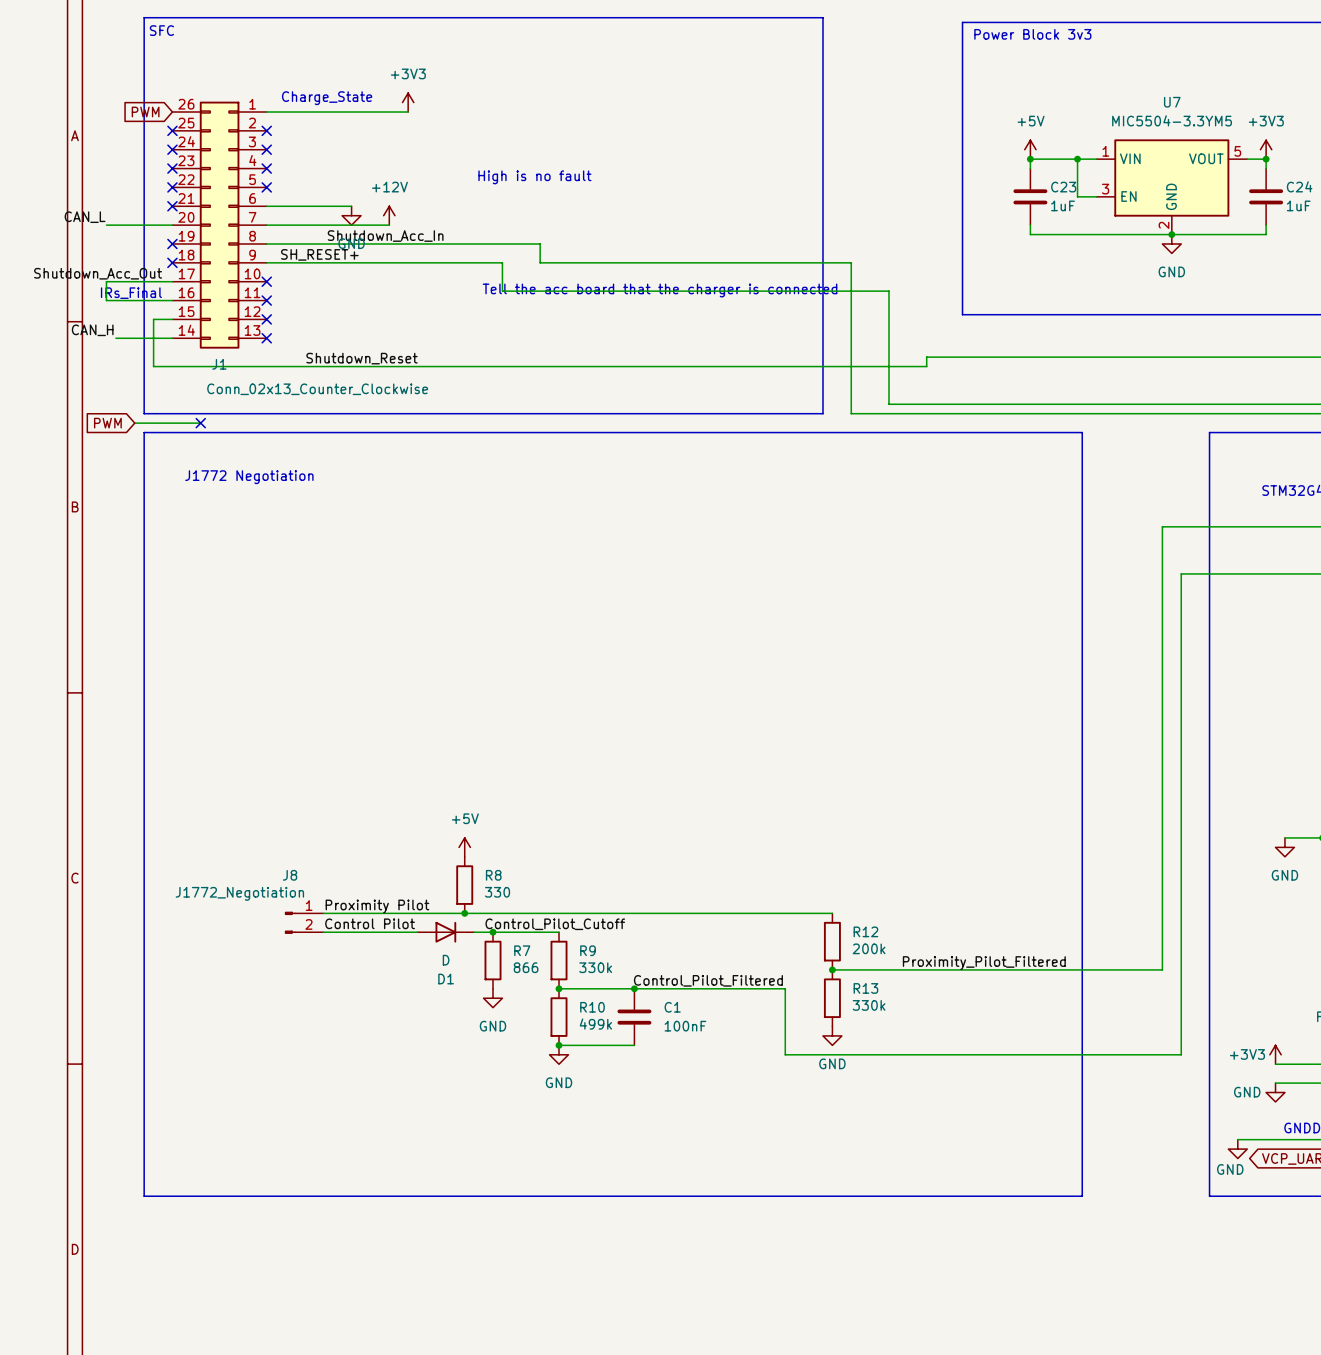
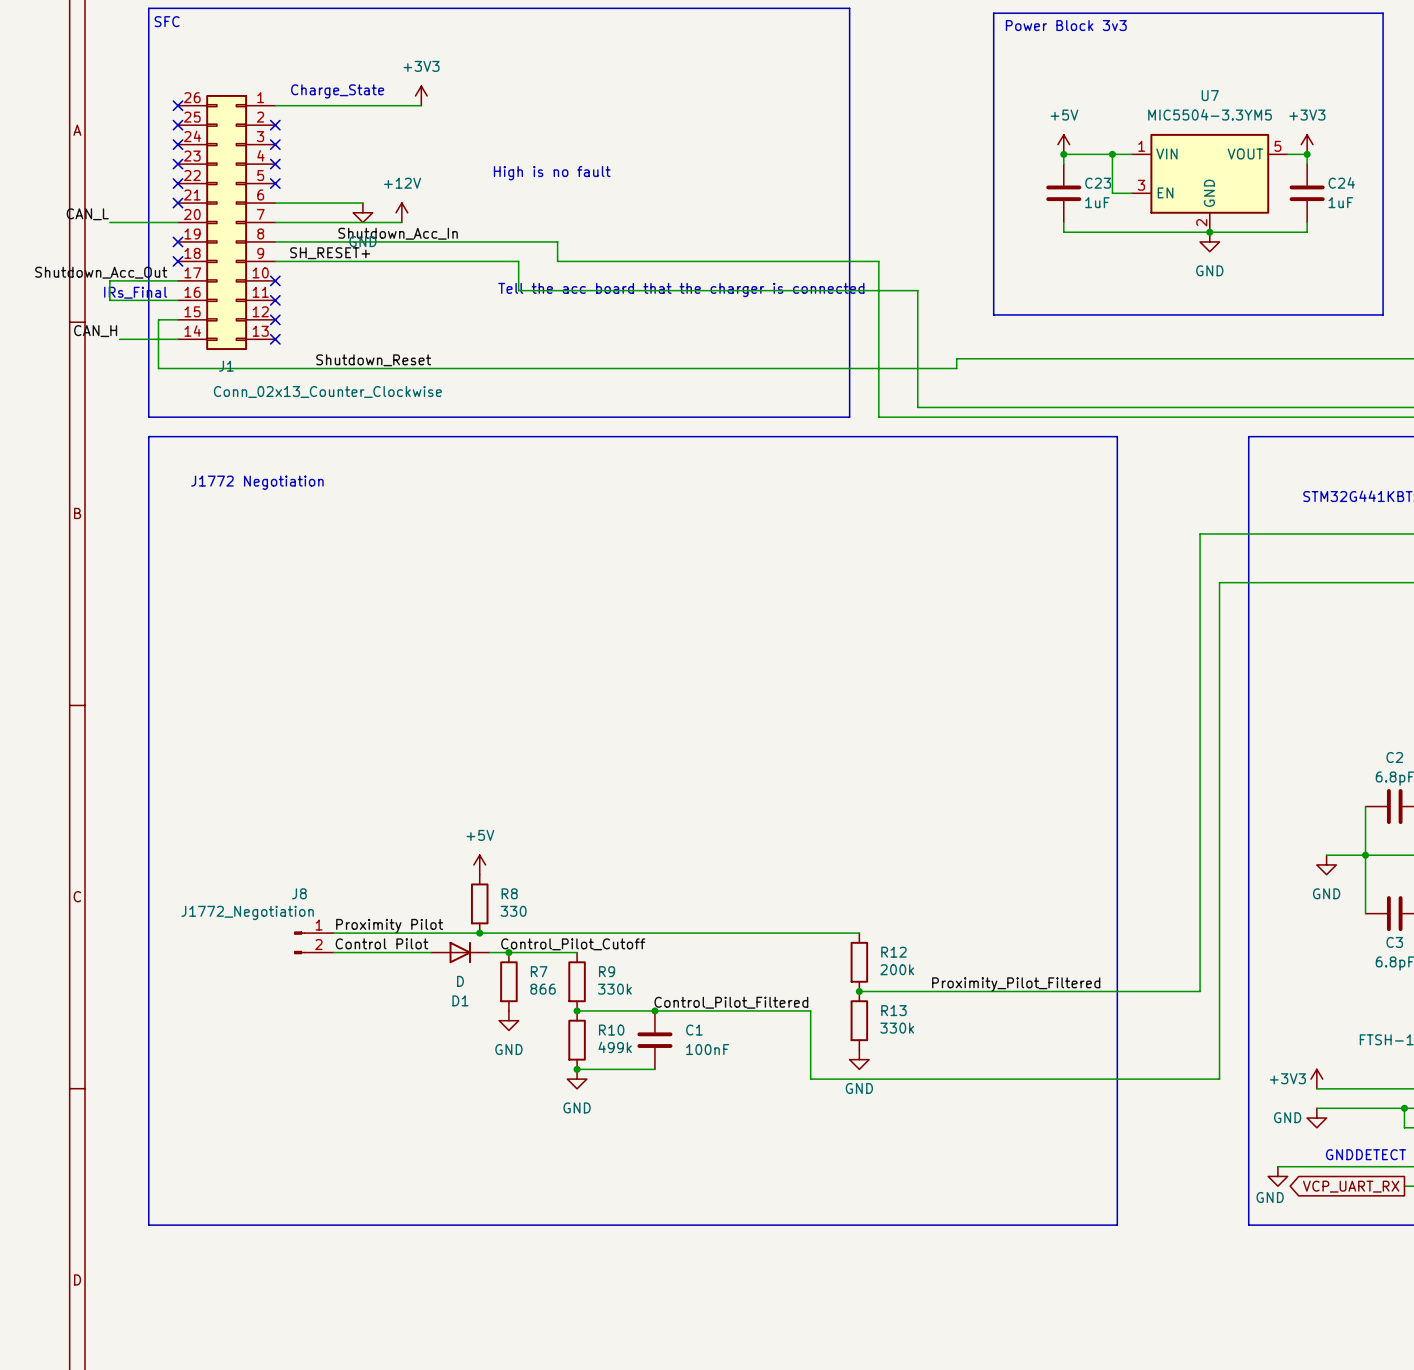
global label: PWM (145, 112) -> none
no-connect mark: none -> (177, 105)
global label: PWM (107, 423) -> none
wire: (134, 423) (200, 423) -> none
no-connect mark: (200, 423) -> none

